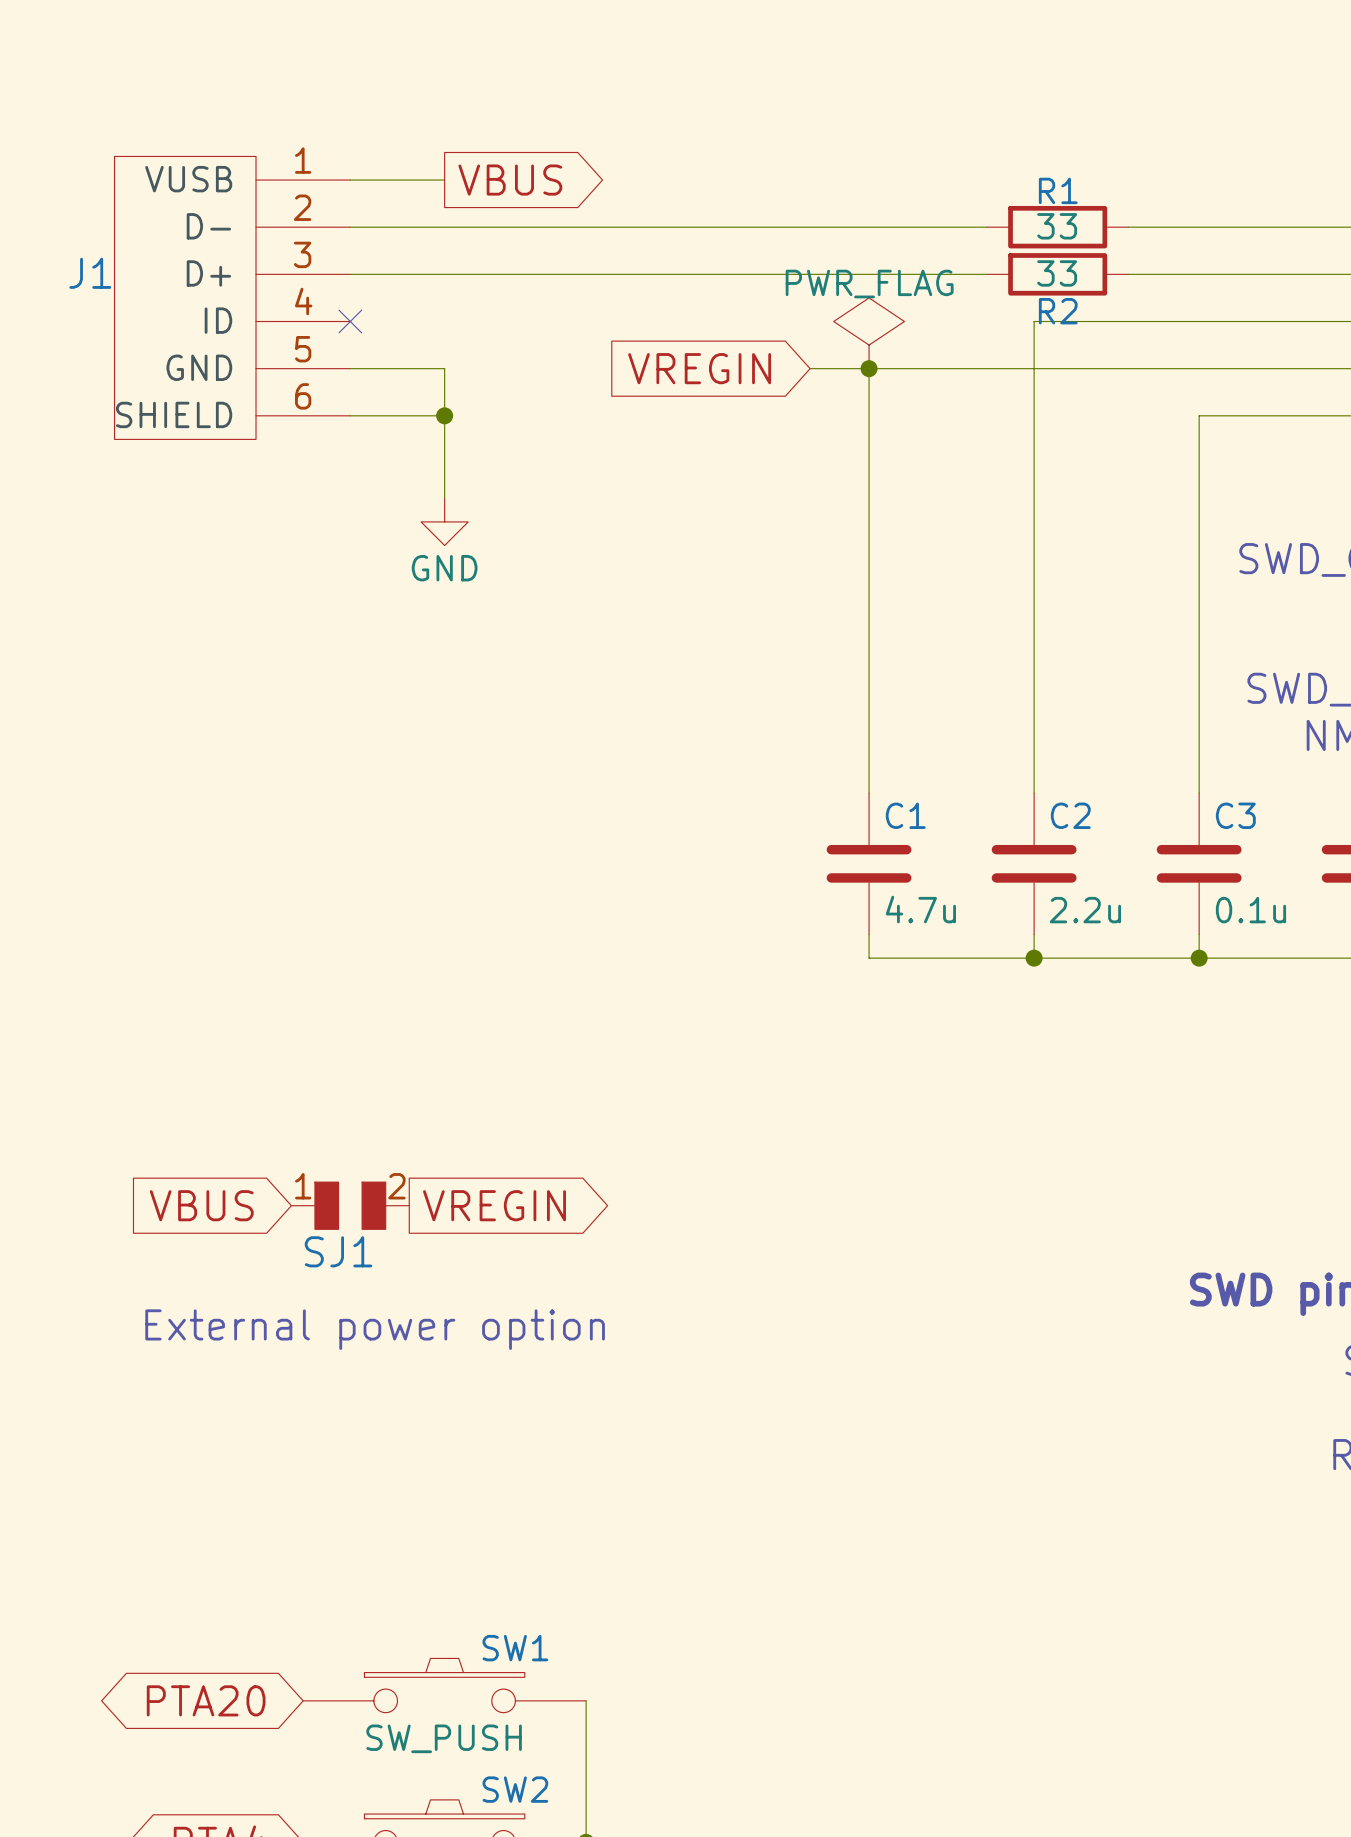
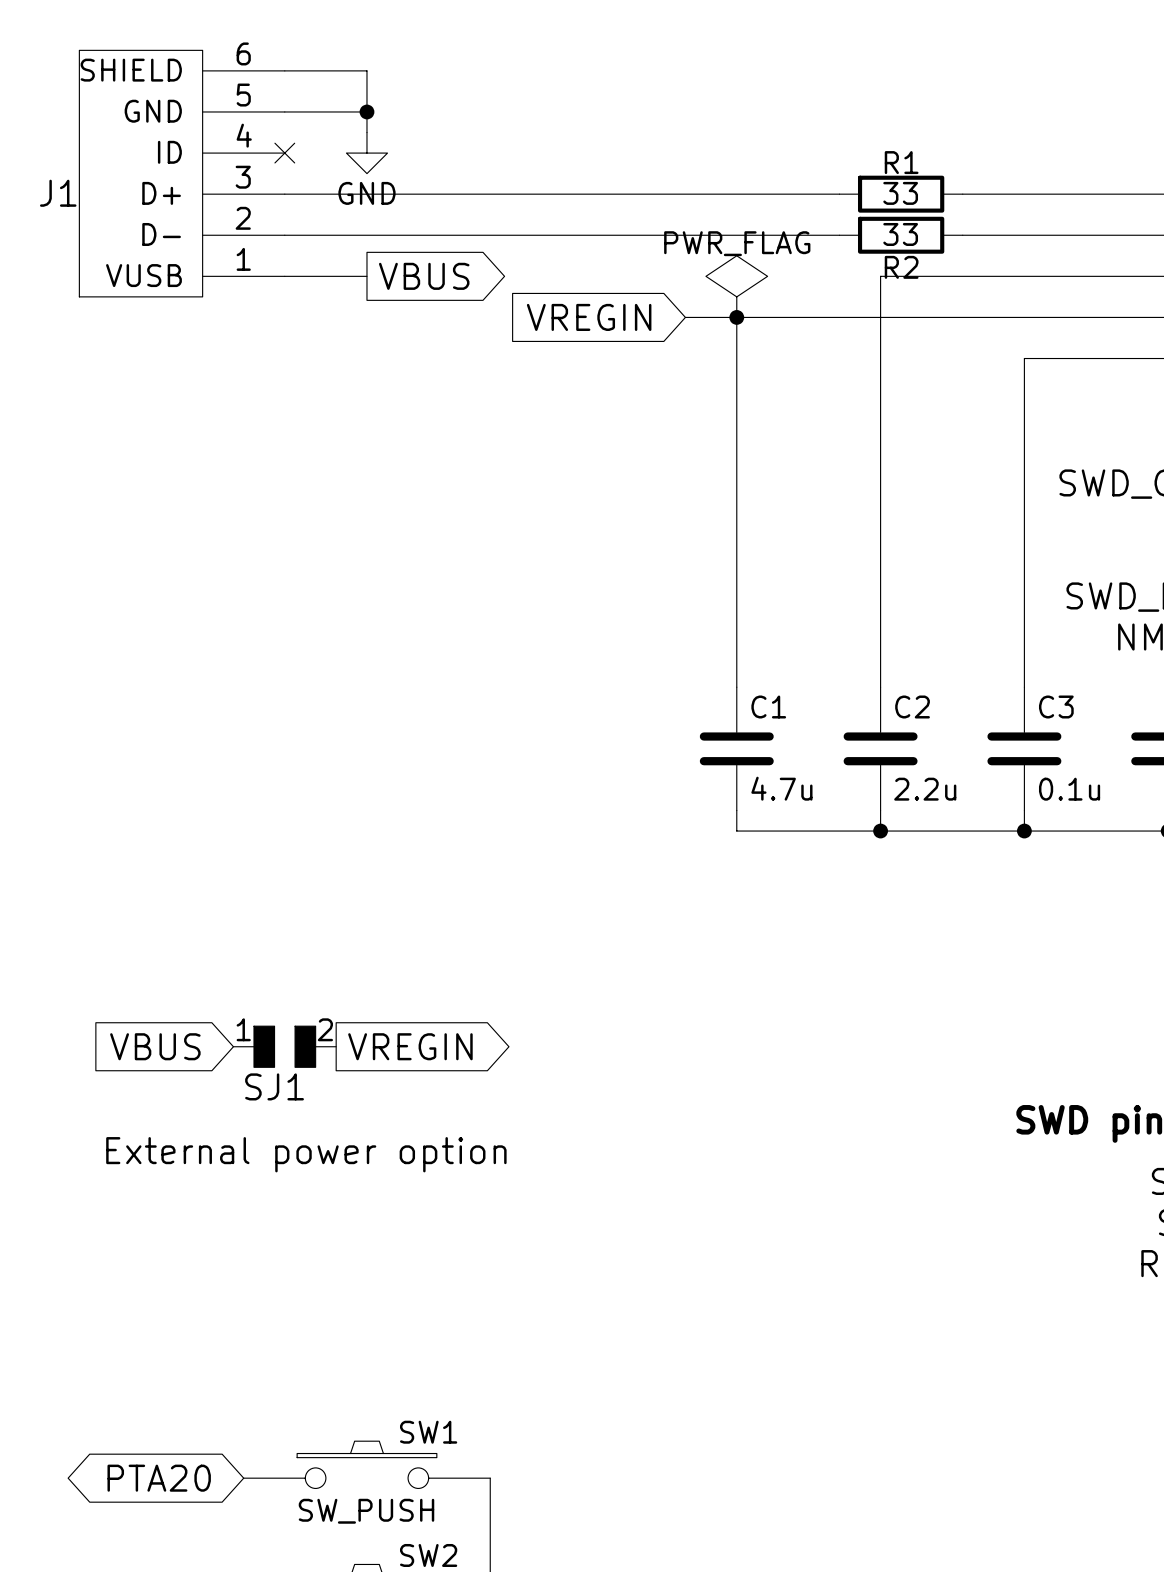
wire: none -> (284, 70) (366, 70) (366, 132)
junction: none -> (366, 111)
wire: (350, 180) (444, 180) -> (284, 111) (366, 111)
no-connect mark: none -> (284, 153)
global label position: VBUS (510, 180) -> VBUS (424, 276)
J1 flip: as is (185, 297) -> up-down (141, 173)
no-connect mark: (350, 321) -> none
wire: (350, 368) (444, 368) (444, 498) -> none
wire: (350, 415) (444, 415) -> (284, 276) (366, 276)
junction: (444, 415) -> none
power symbol position: GND (444, 521) -> GND (366, 153)

